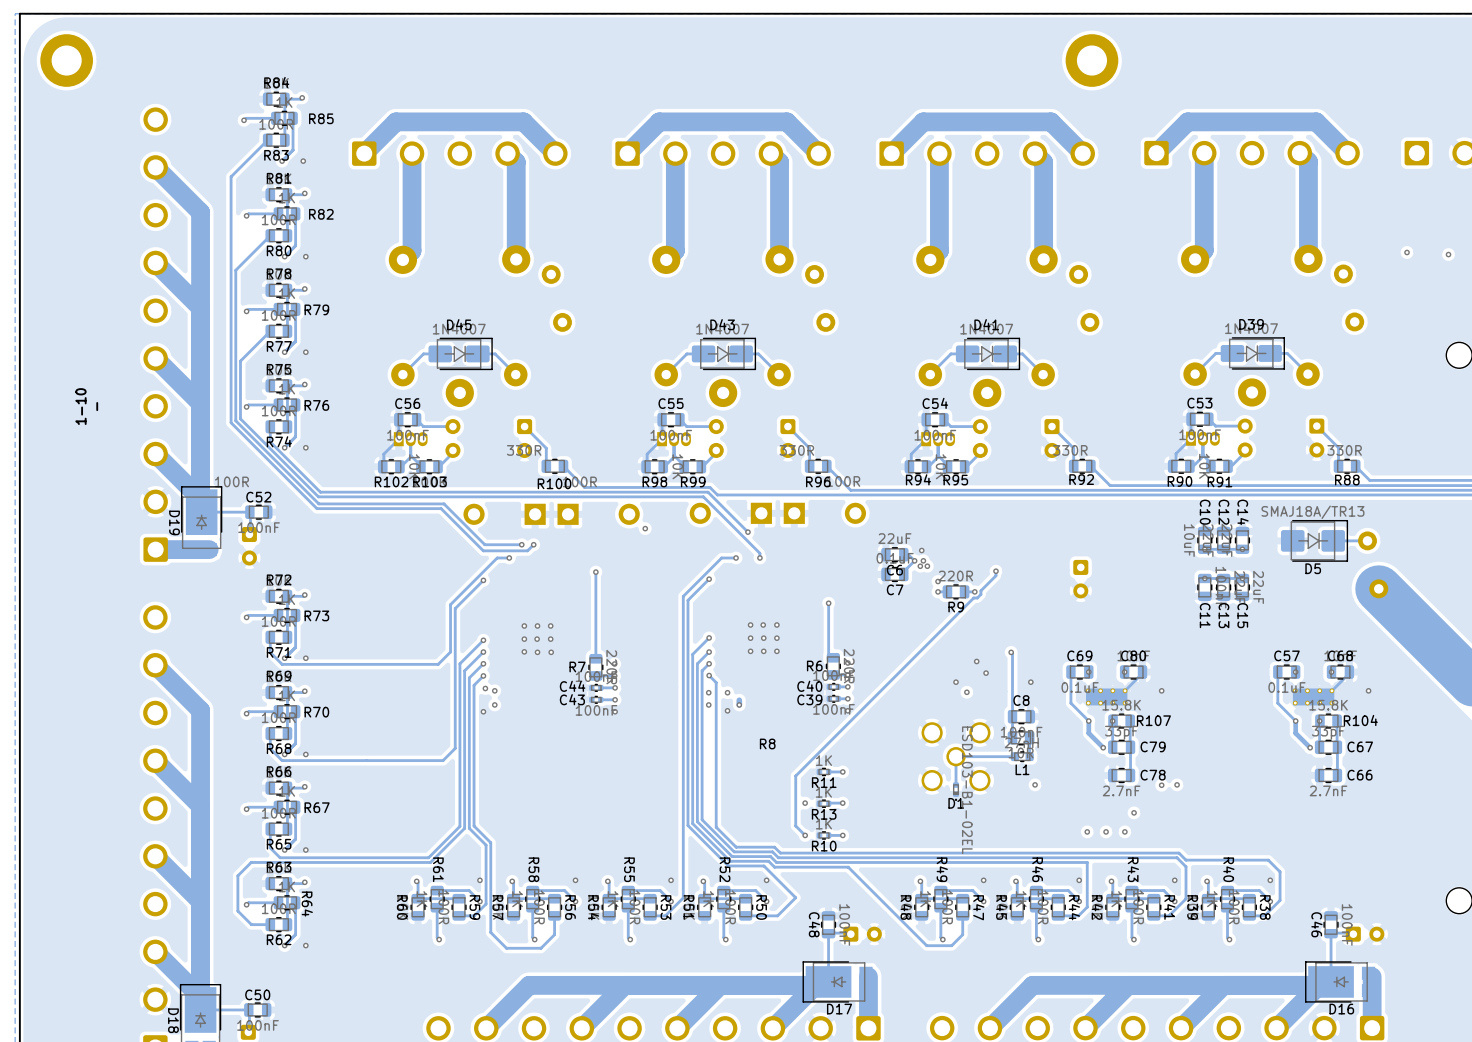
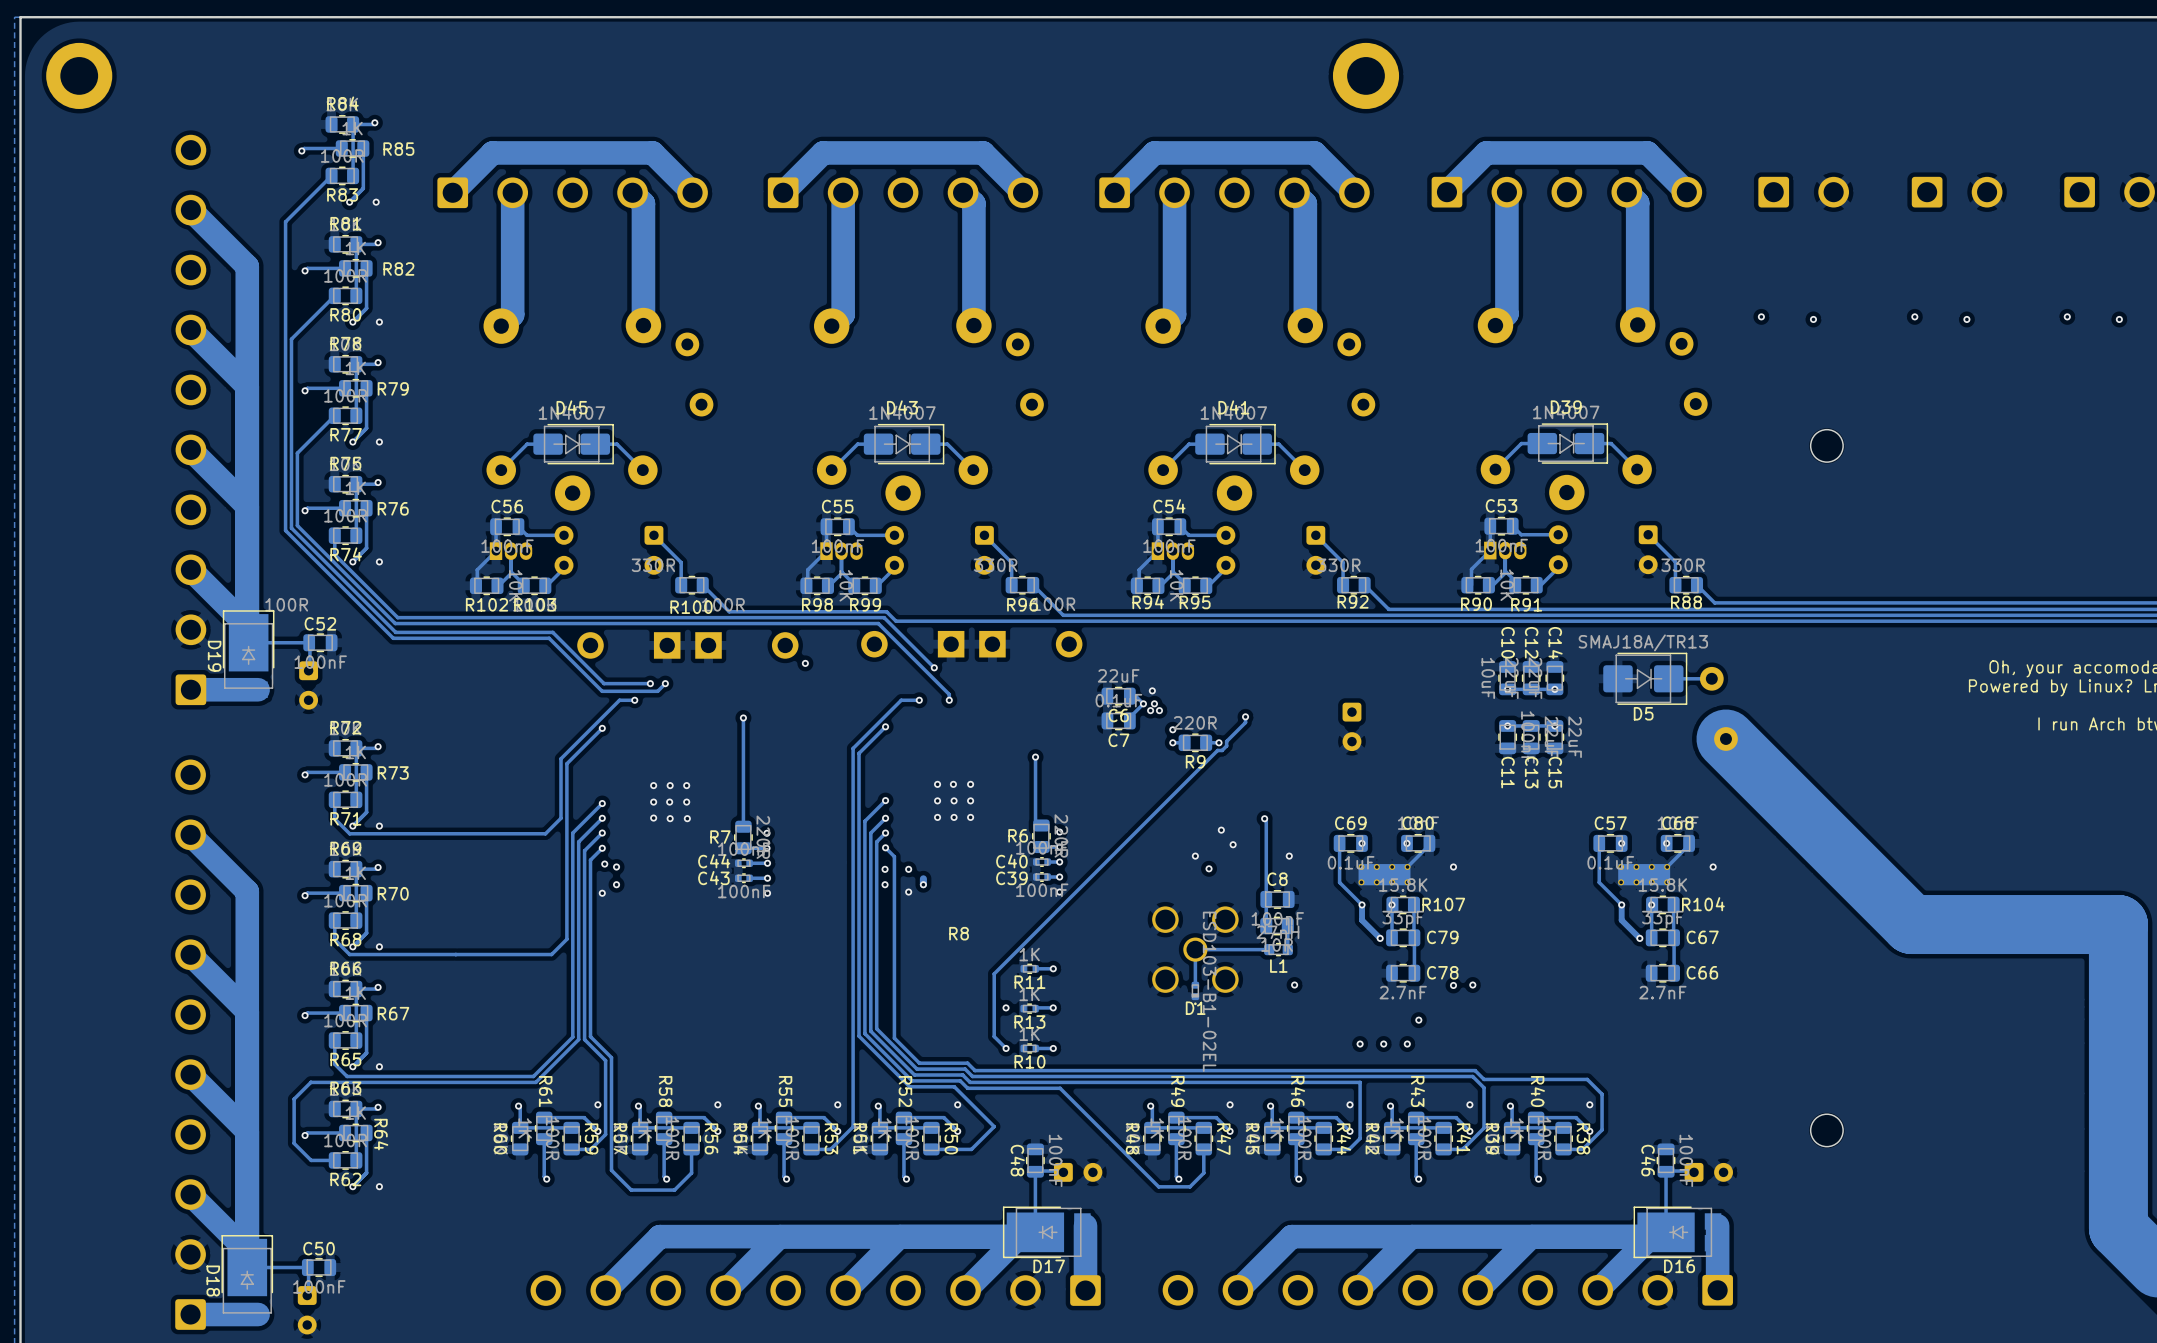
text: 1-10 (80, 406) -> none
text: - (97, 406) -> none

